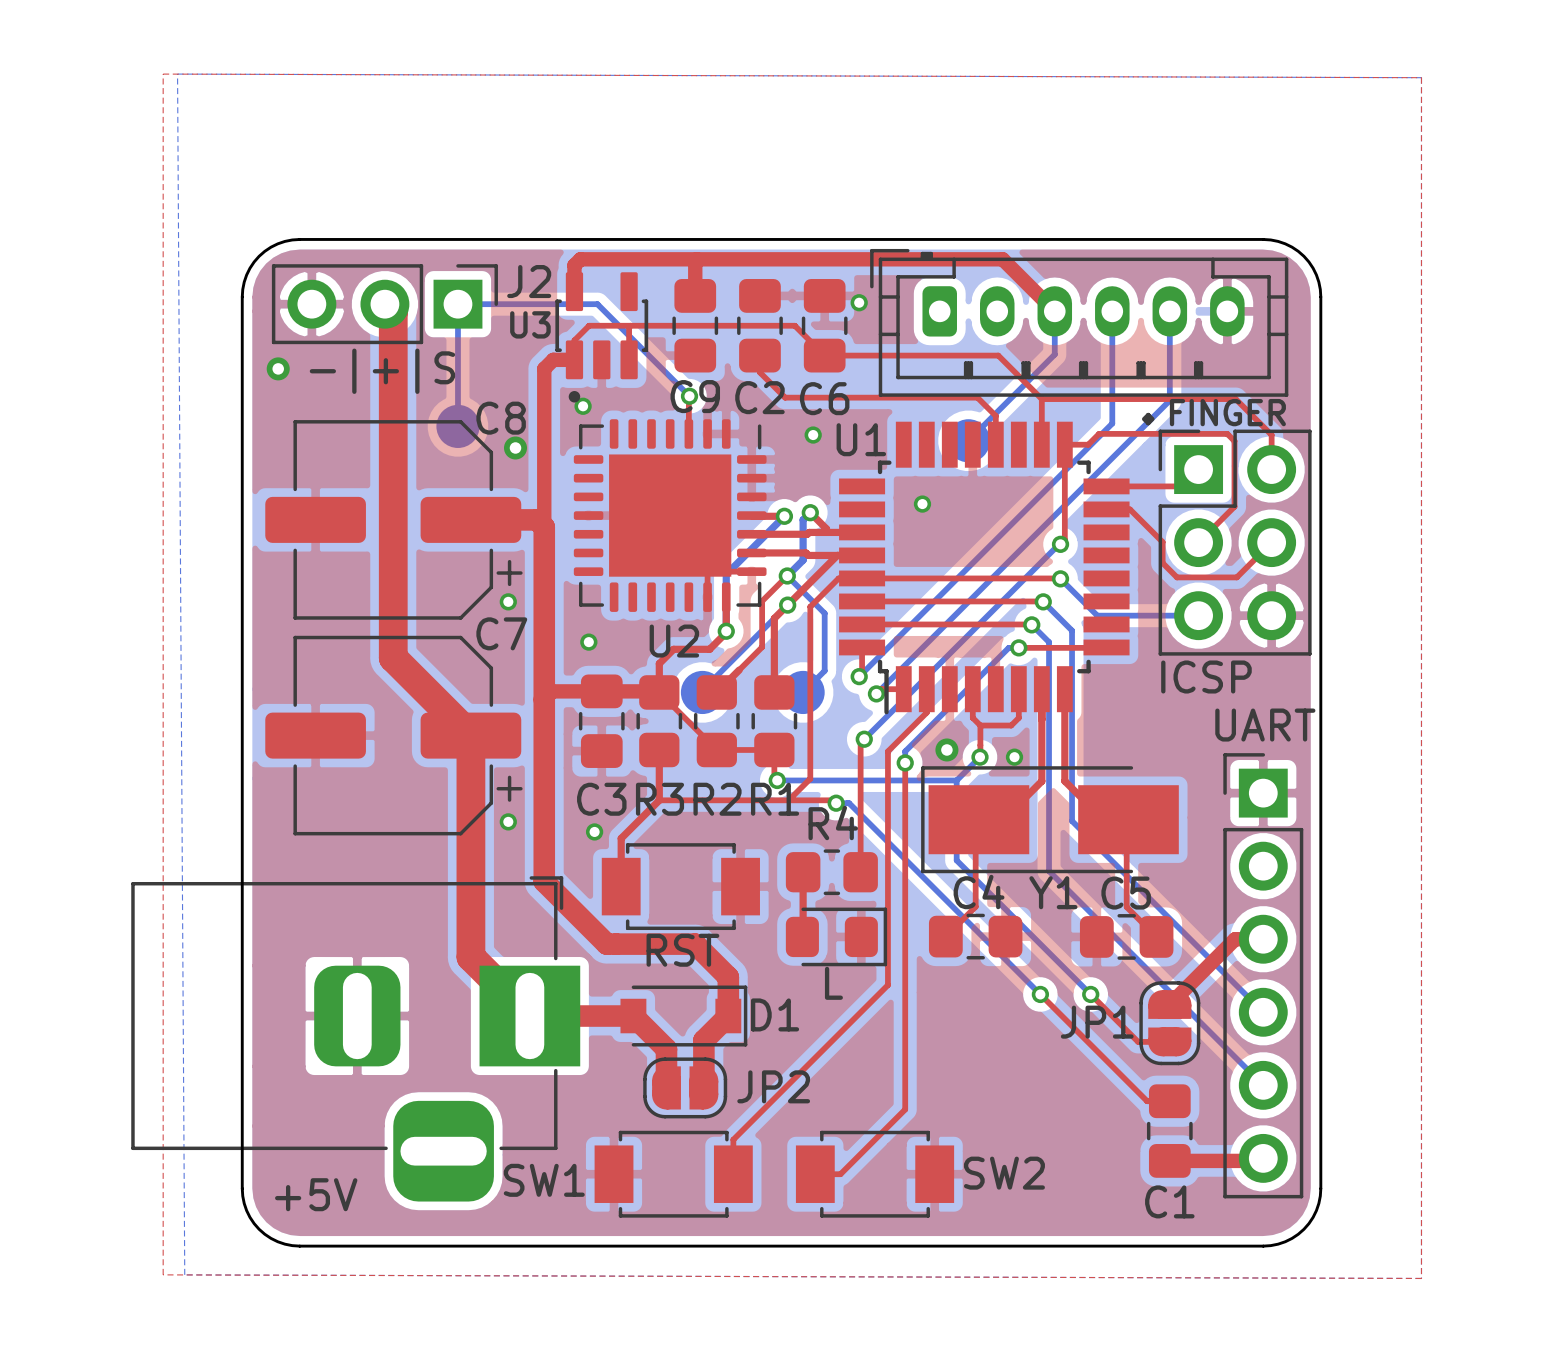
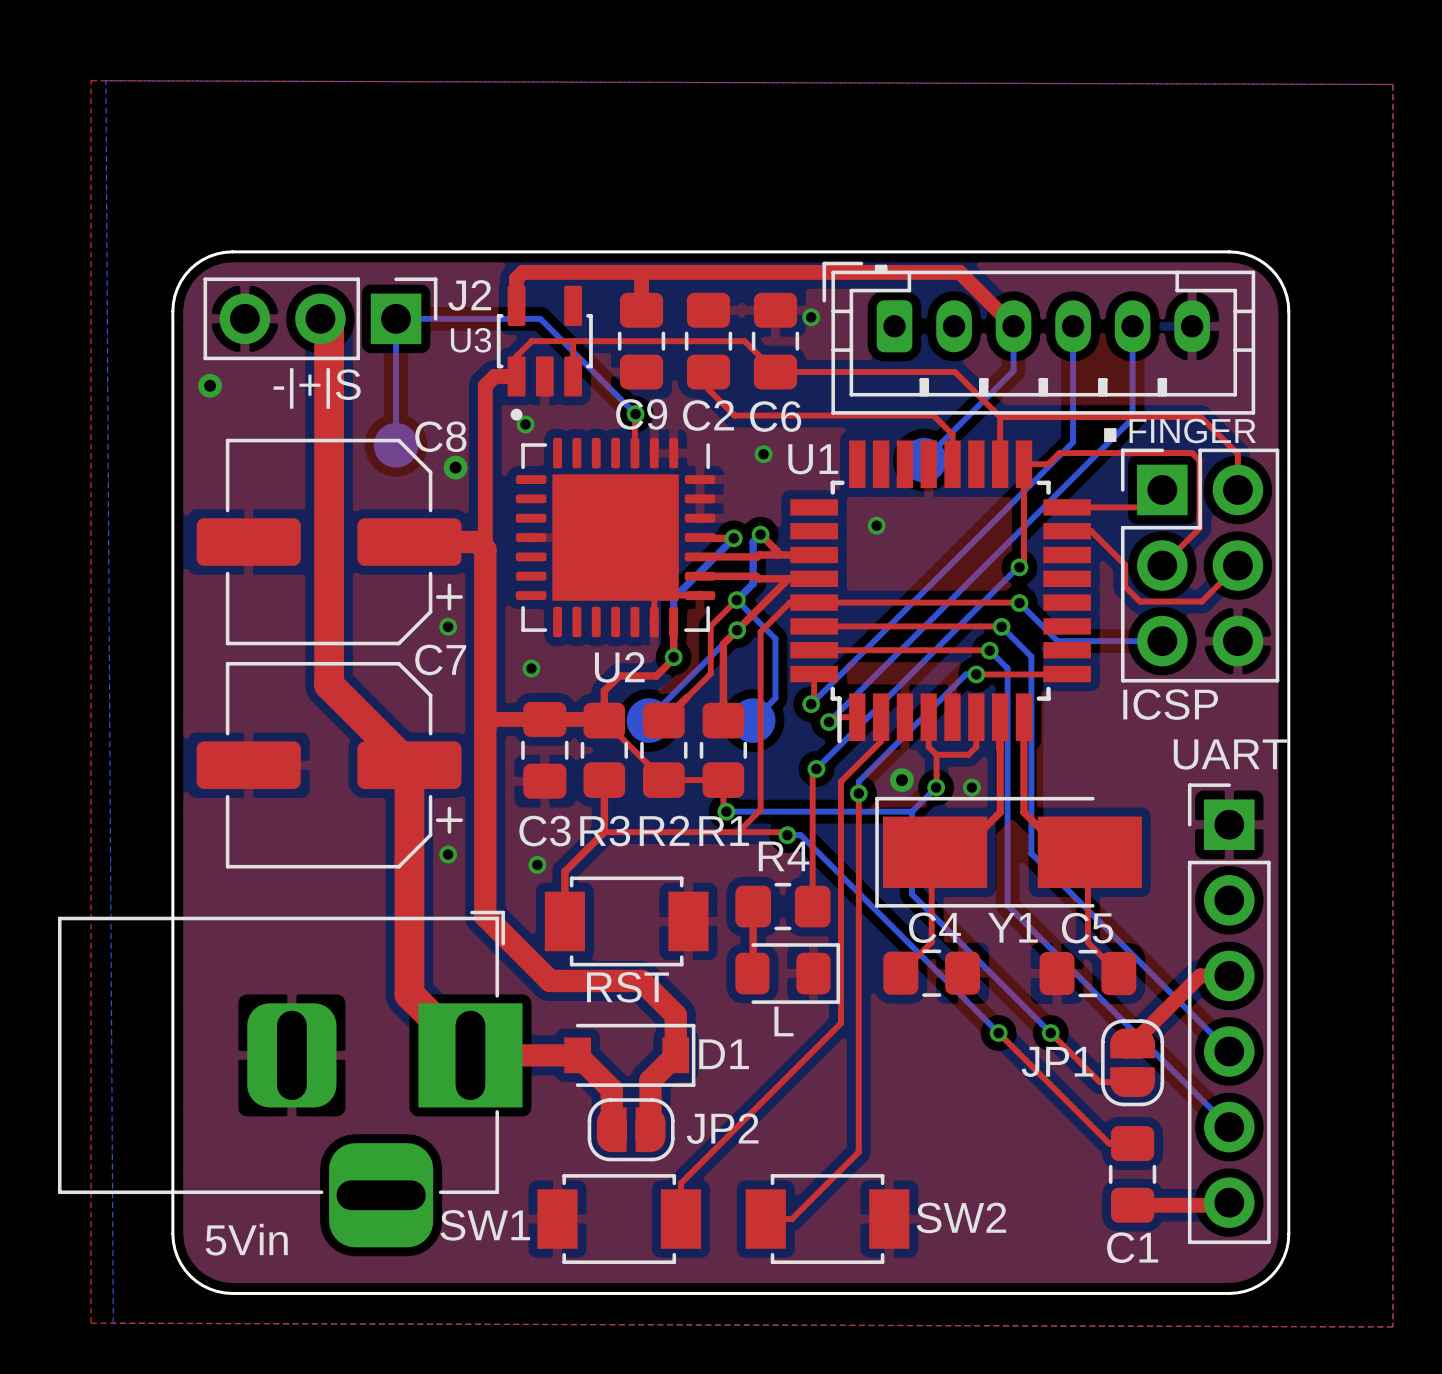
+5V name: +5V (316, 1194) -> 5Vin (246, 1239)

